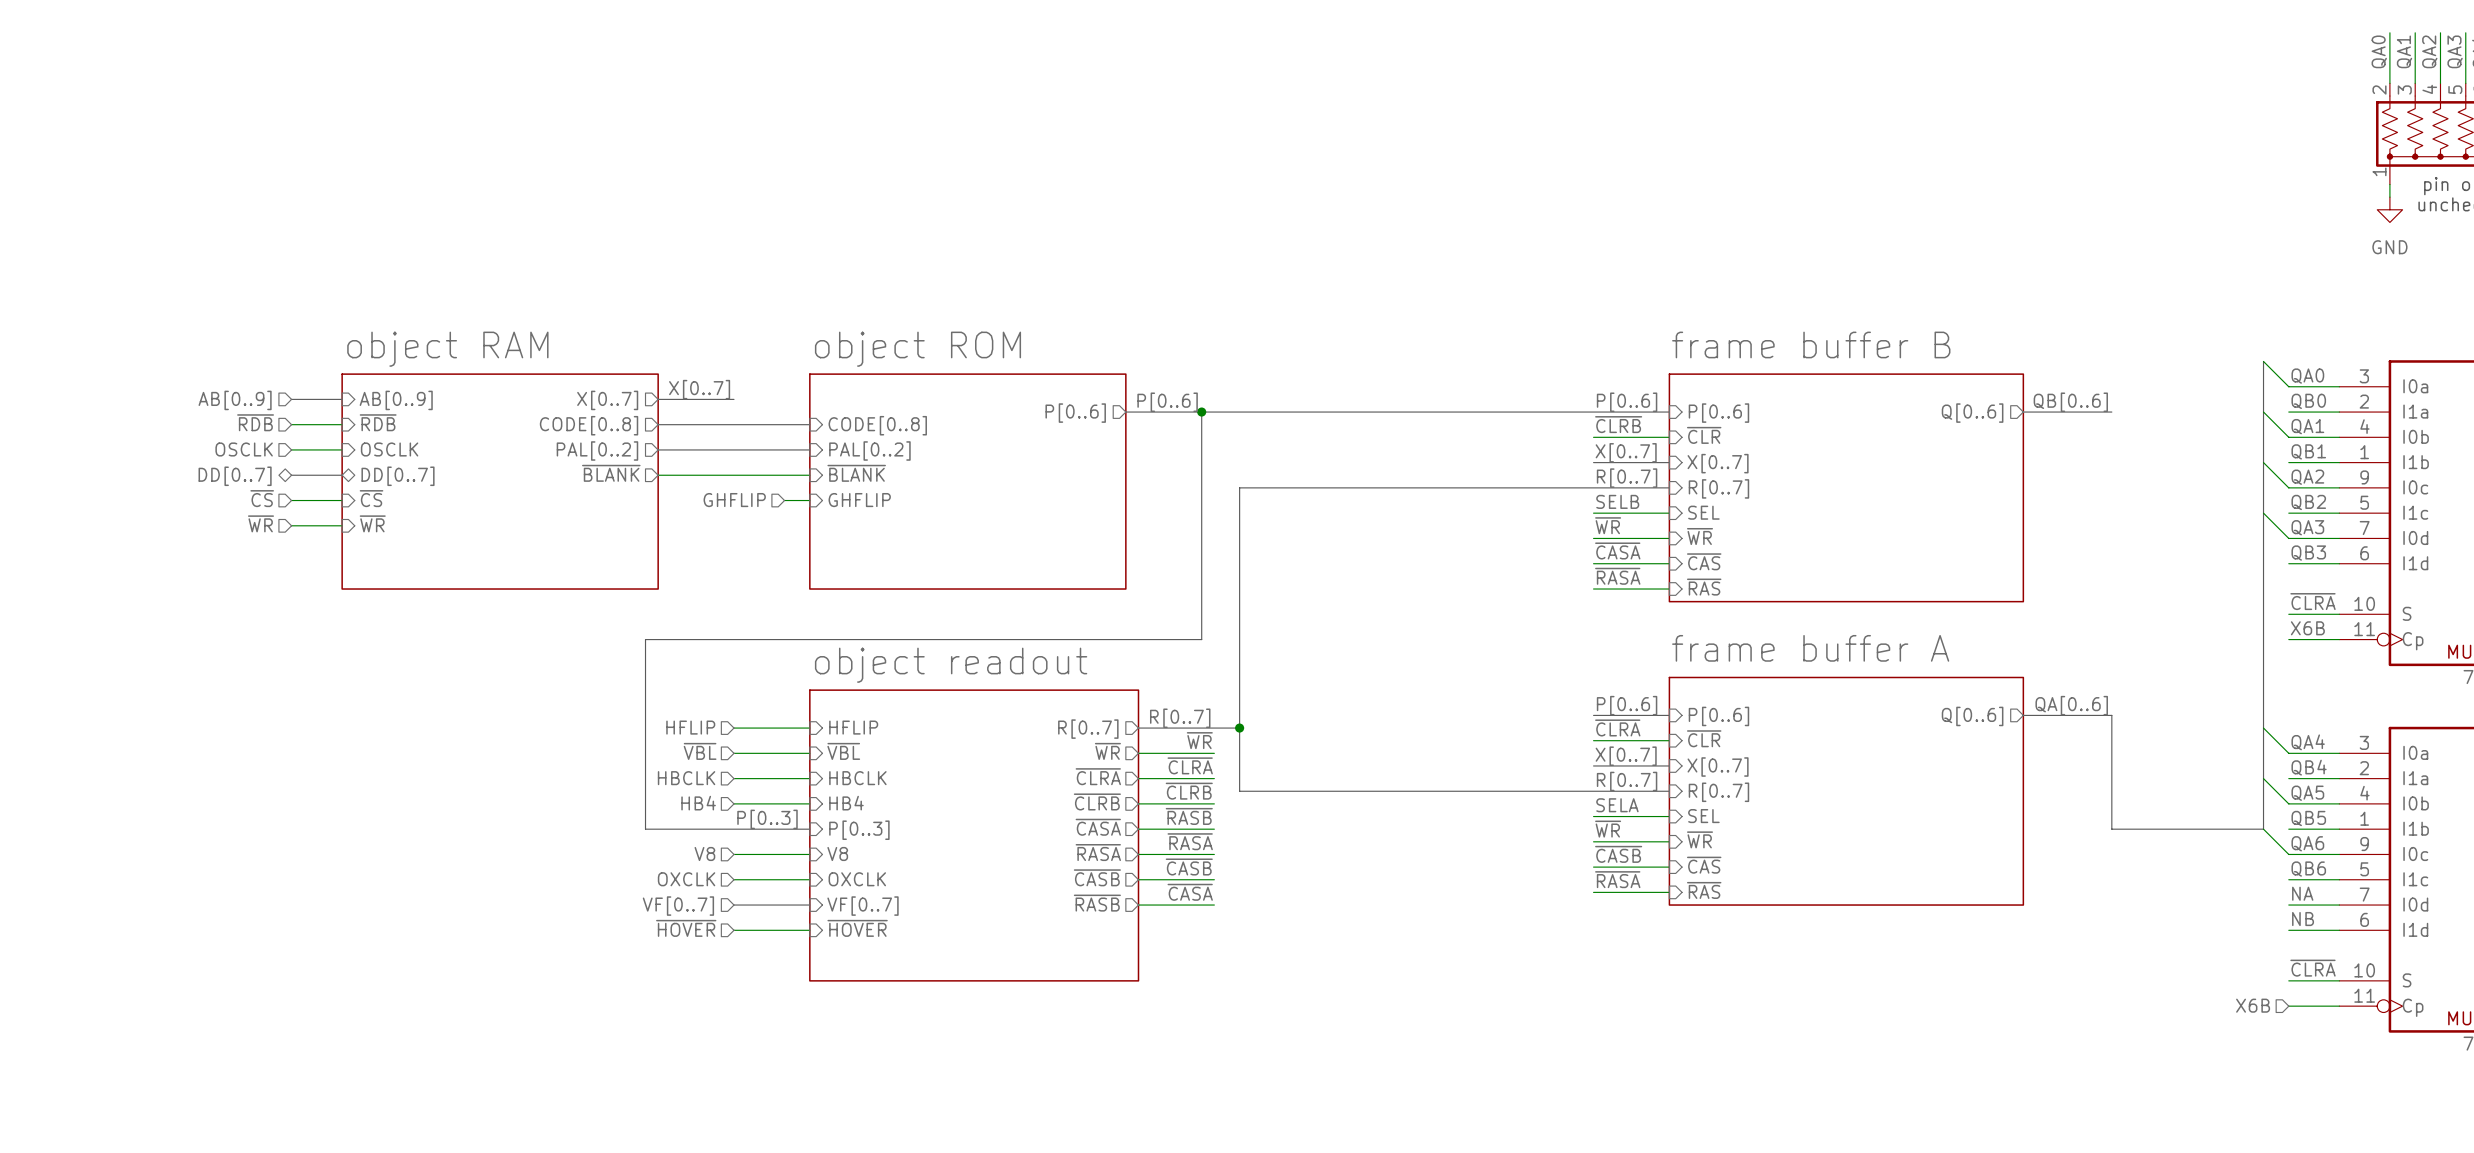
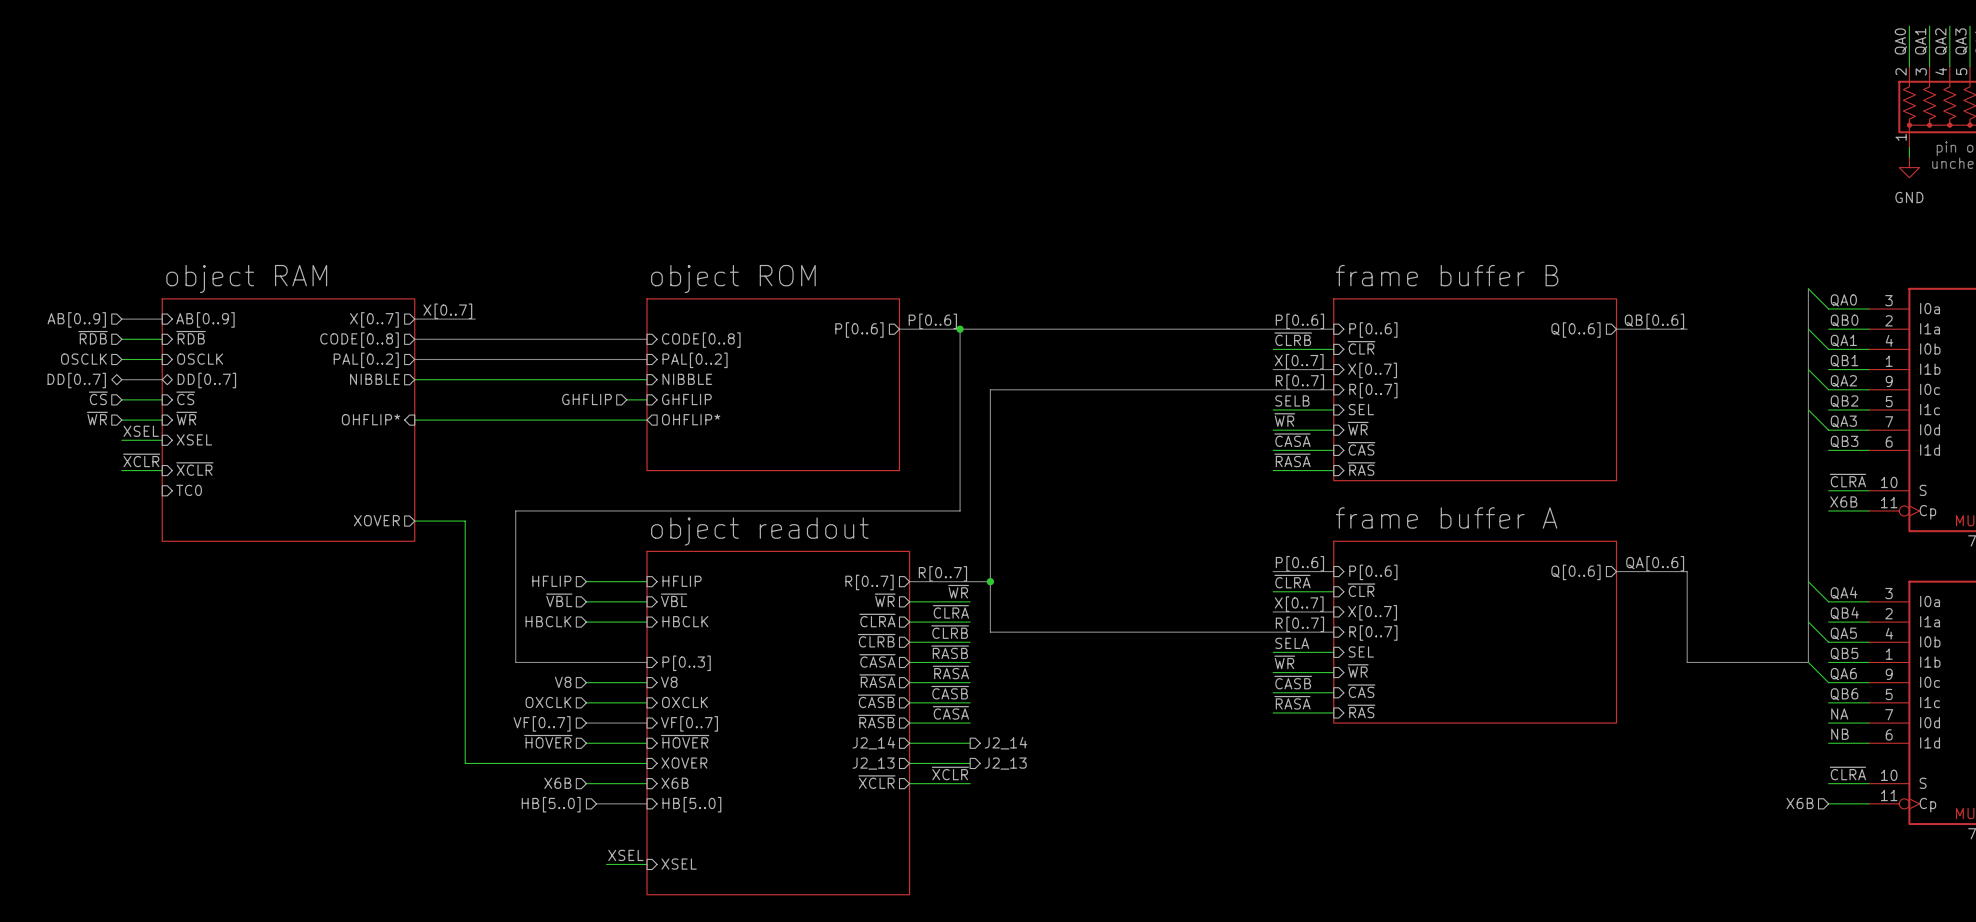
label position: X[0..7] (699, 389) -> X[0..7] (447, 311)
bus: (291, 399) (342, 399) -> (121, 319) (162, 319)
bus: (658, 399) (733, 399) -> (414, 319) (475, 319)
hierarchical label position: AB[0..9] (235, 400) -> AB[0..9] (76, 319)
sheet pin position: AB[0..9] (396, 400) -> AB[0..9] (205, 319)
sheet pin position: X[0..7] (607, 400) -> X[0..7] (374, 319)
hierarchical label position: ~{RDB} (255, 422) -> ~{RDB} (93, 337)
sheet pin position: ~{RDB} (378, 422) -> ~{RDB} (191, 337)
wire: (291, 424) (342, 424) -> (121, 339) (162, 339)
bus: none -> (414, 339) (525, 339)
sheet pin position: CODE[0..8] (589, 425) -> CODE[0..8] (359, 340)
hierarchical label position: OSCLK (244, 449) -> OSCLK (83, 359)
wire: (291, 449) (342, 449) -> (121, 359) (162, 359)
sheet pin position: OSCLK (389, 449) -> OSCLK (200, 359)
bus: none -> (414, 359) (525, 359)
sheet pin position: PAL[0..2] (597, 450) -> PAL[0..2] (366, 360)
sheet pin: ~{BLANK} (611, 473) -> none
sheet pin: ~{BLANK} (856, 473) -> NIBBLE (687, 379)
sheet pin: none -> NIBBLE (374, 379)
bus: (291, 475) (342, 475) -> (121, 379) (162, 379)
wire: none -> (414, 379) (525, 379)
hierarchical label position: DD[0..7] (235, 476) -> DD[0..7] (76, 380)
sheet pin position: DD[0..7] (398, 476) -> DD[0..7] (206, 380)
sheet object RAM: (500, 481) -> none
hierarchical label position: ~{CS} (262, 498) -> ~{CS} (98, 398)
sheet pin position: ~{CS} (371, 498) -> ~{CS} (185, 398)
wire: (291, 500) (342, 500) -> (121, 399) (162, 399)
hierarchical label position: ~{WR} (260, 523) -> ~{WR} (97, 418)
sheet pin position: ~{WR} (372, 523) -> ~{WR} (186, 418)
wire: (291, 525) (342, 525) -> (121, 420) (162, 420)
sheet object RAM: none -> (288, 420)
sheet pin: none -> OHFLIP* (371, 419)
wire: none -> (414, 420) (647, 420)
sheet pin: none -> OHFLIP* (691, 419)
label: none -> XSEL (141, 431)
sheet pin: none -> XSEL (194, 439)
wire: none -> (121, 440) (162, 440)
label: none -> ~{XCLR} (141, 460)
sheet pin: none -> ~{XCLR} (194, 469)
wire: none -> (121, 470) (162, 470)
sheet pin: none -> TC0 (189, 490)
sheet pin: none -> XOVER (376, 520)
wire: none -> (414, 521) (465, 521) (465, 763) (647, 763)
hierarchical label: HB4 (698, 803) -> none
wire: (733, 803) (809, 803) -> (586, 783) (647, 783)
sheet pin: HB4 (846, 803) -> none
label: P[0..3] (767, 819) -> none
sheet object readout: (974, 835) -> none
sheet object readout: none -> (778, 723)
sheet pin: none -> J2_14 (873, 743)
wire: none -> (909, 743) (970, 743)
hierarchical label: none -> J2_14 (1005, 743)
sheet pin: none -> XOVER (684, 763)
sheet pin: none -> J2_13 (873, 763)
wire: none -> (909, 763) (970, 763)
hierarchical label: none -> J2_13 (1005, 763)
label: none -> ~{XCLR} (950, 773)
sheet pin: none -> ~{XCLR} (876, 782)
hierarchical label: none -> X6B (557, 783)
sheet pin: none -> X6B (675, 783)
wire: none -> (909, 783) (970, 783)
bus: none -> (596, 803) (647, 803)
hierarchical label: none -> HB[5..0] (551, 804)
sheet pin: none -> HB[5..0] (691, 804)
label: none -> XSEL (625, 855)
wire: none -> (606, 864) (647, 864)
sheet pin: none -> XSEL (679, 864)

